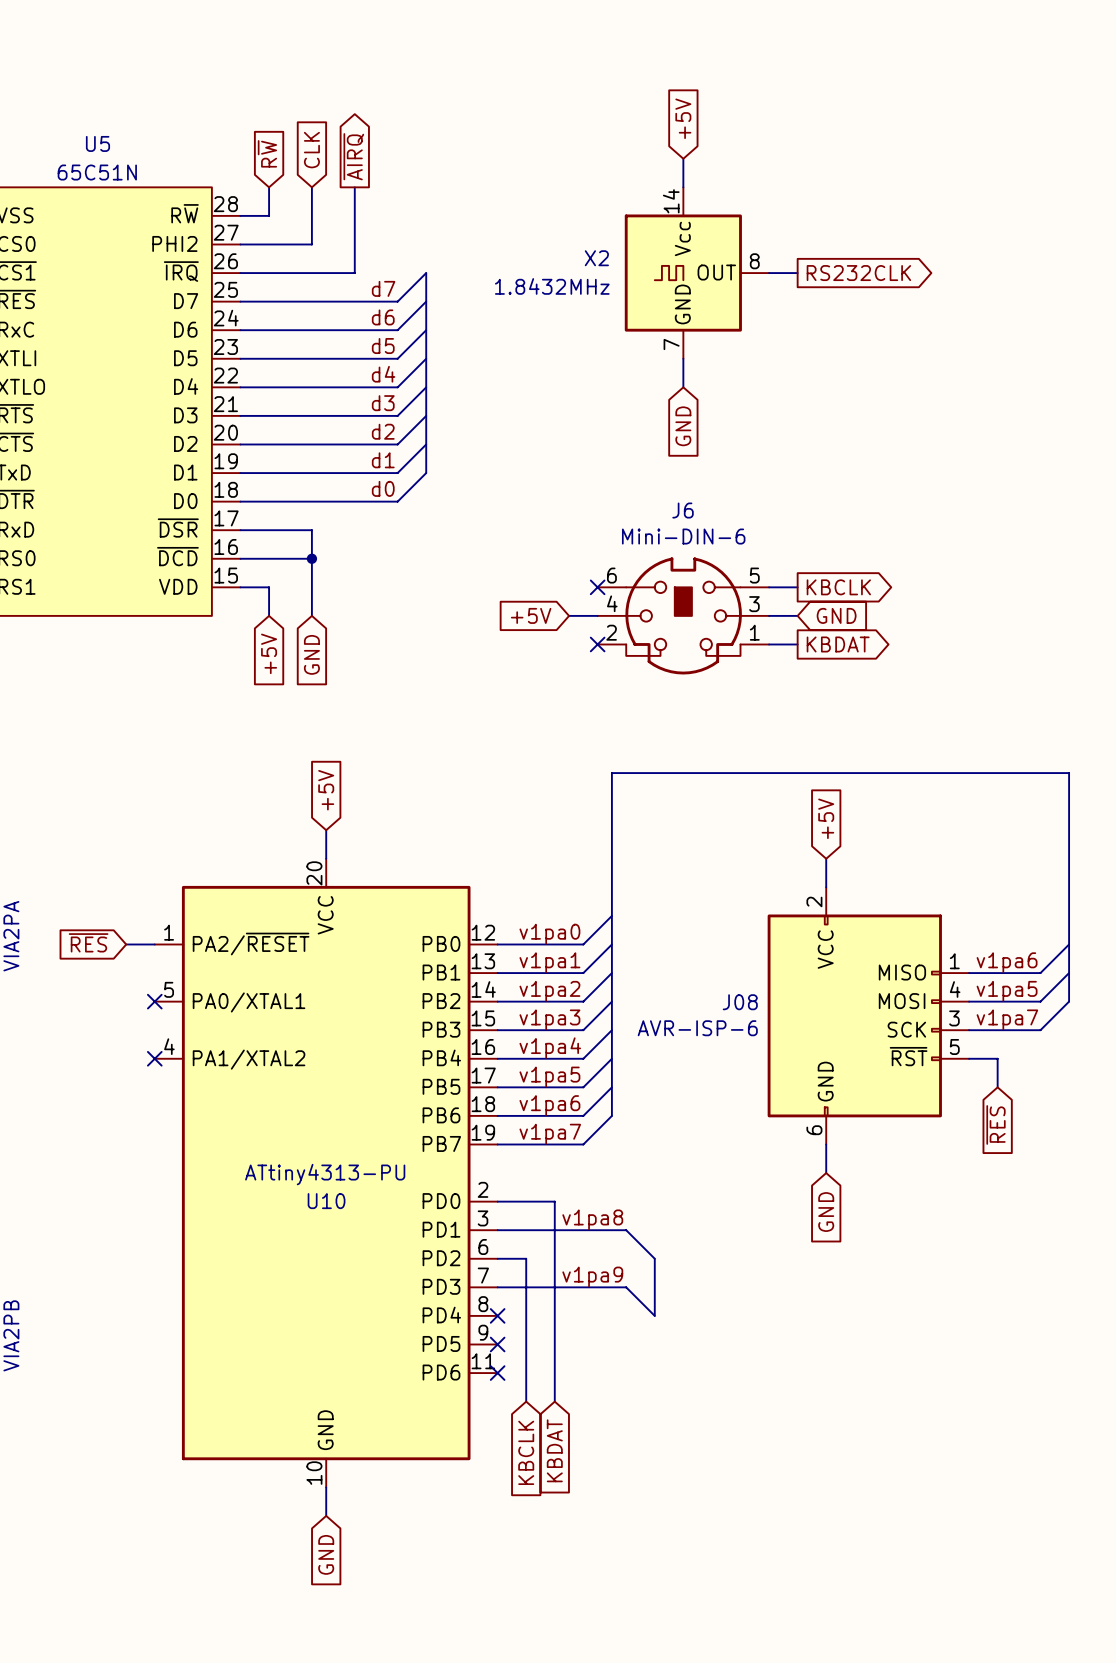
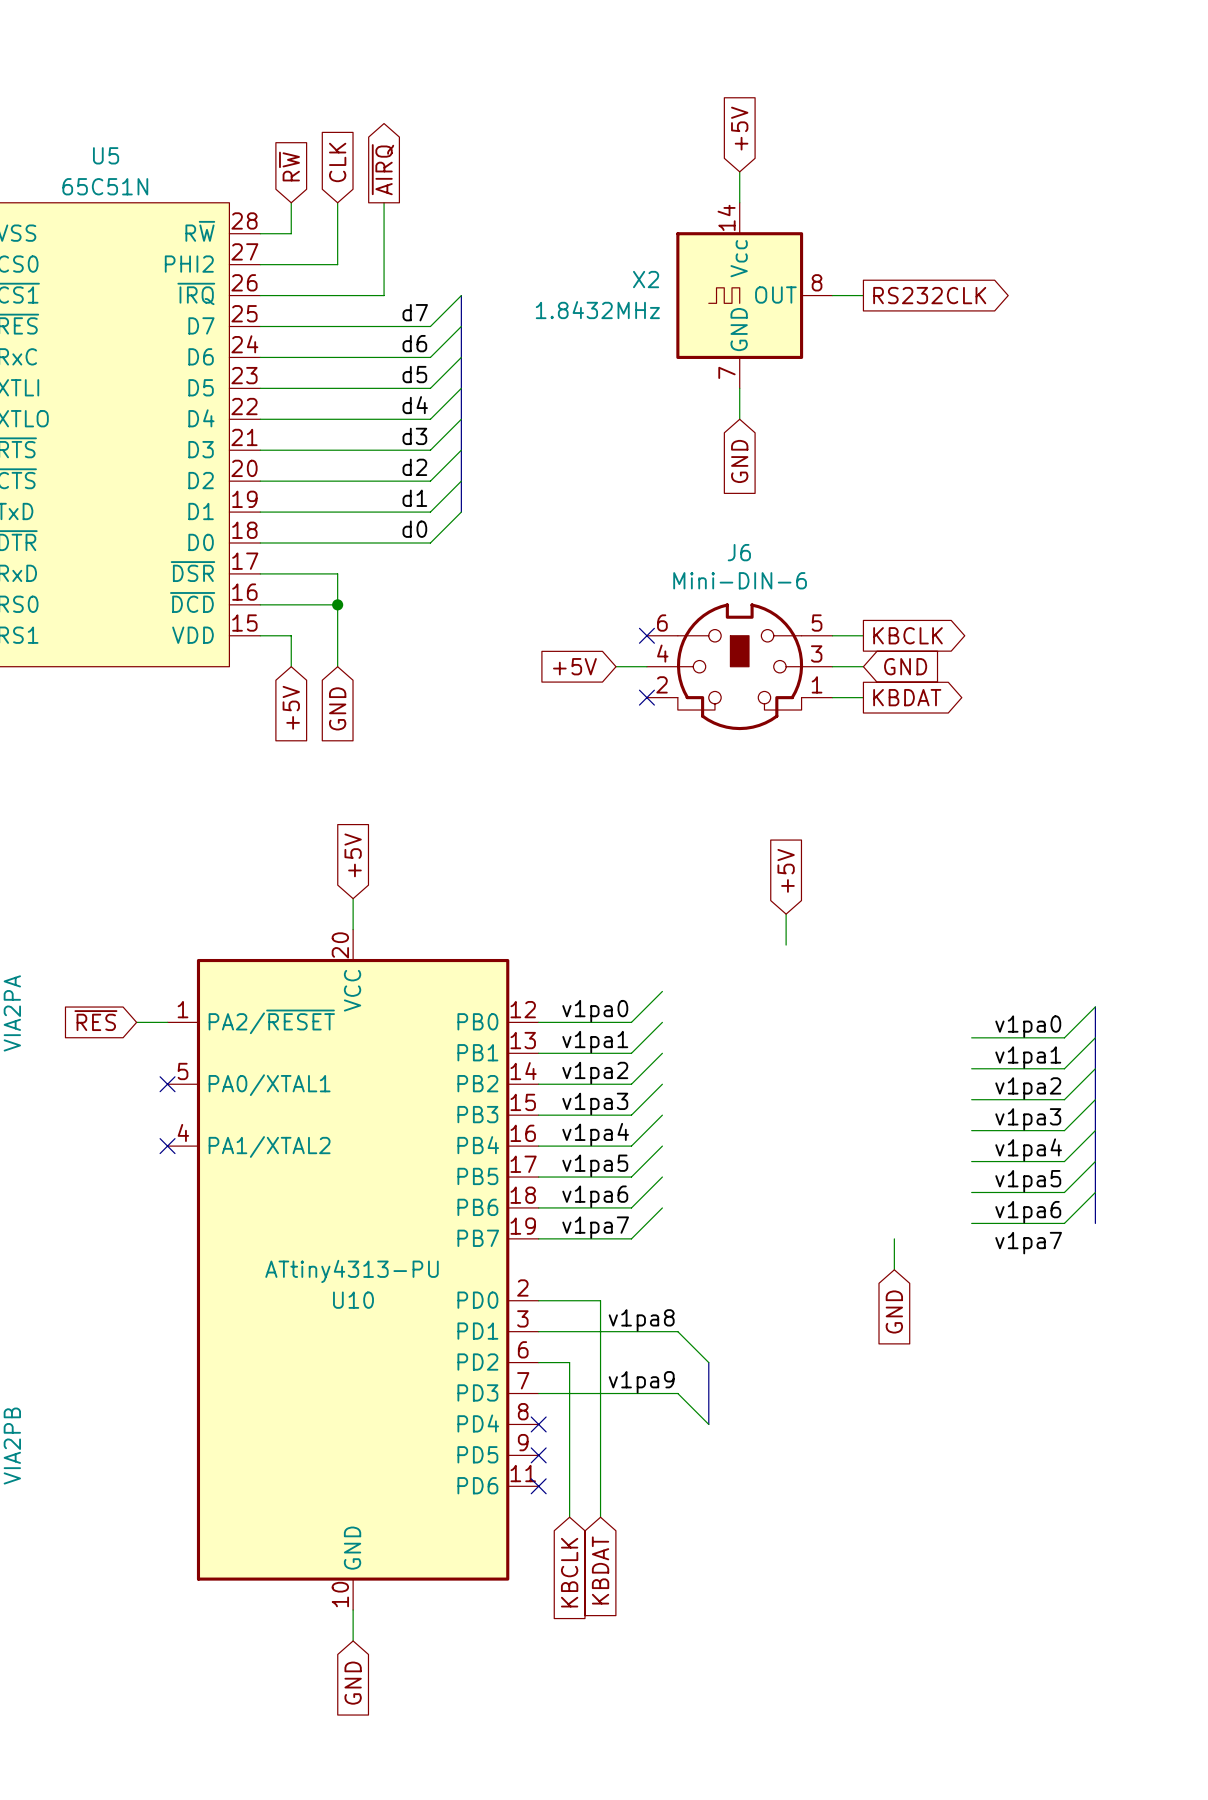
global label position: +5V (826, 818) -> +5V (786, 870)
wire: (826, 858) (826, 887) -> (786, 914) (786, 945)
wire: none -> (1095, 1006) (1064, 1037) (971, 1037)
bus: none -> (1095, 1006) (1095, 1223)
wire: (1069, 944) (1040, 973) (969, 973) -> none
label: none -> v1pa0 (1028, 1026)
wire: none -> (1095, 1037) (1064, 1068) (971, 1068)
label position: v1pa6 (1007, 962) -> v1pa6 (1028, 1212)
wire: (1069, 973) (1040, 1001) (969, 1001) -> none
label: none -> v1pa1 (1028, 1057)
wire: none -> (1095, 1068) (1064, 1099) (971, 1099)
label position: v1pa5 (1007, 991) -> v1pa5 (1028, 1181)
wire: (1069, 1001) (1040, 1030) (969, 1030) -> none
bus: (1069, 1001) (1069, 773) (611, 773) (611, 1115) -> none
label: none -> v1pa2 (1028, 1088)
J08: AVR-ISP-6 (868, 1015) -> none
wire: none -> (1095, 1099) (1064, 1130) (971, 1130)
label position: v1pa7 (1007, 1019) -> v1pa7 (1028, 1243)
label: none -> v1pa3 (1028, 1119)
wire: none -> (1095, 1130) (1064, 1161) (971, 1161)
wire: (969, 1058) (997, 1058) (997, 1087) -> none
label: none -> v1pa4 (1028, 1149)
wire: none -> (1095, 1161) (1064, 1192) (971, 1192)
wire: none -> (1095, 1192) (1064, 1223) (971, 1223)
global label: ~{RES} (996, 1124) -> none

